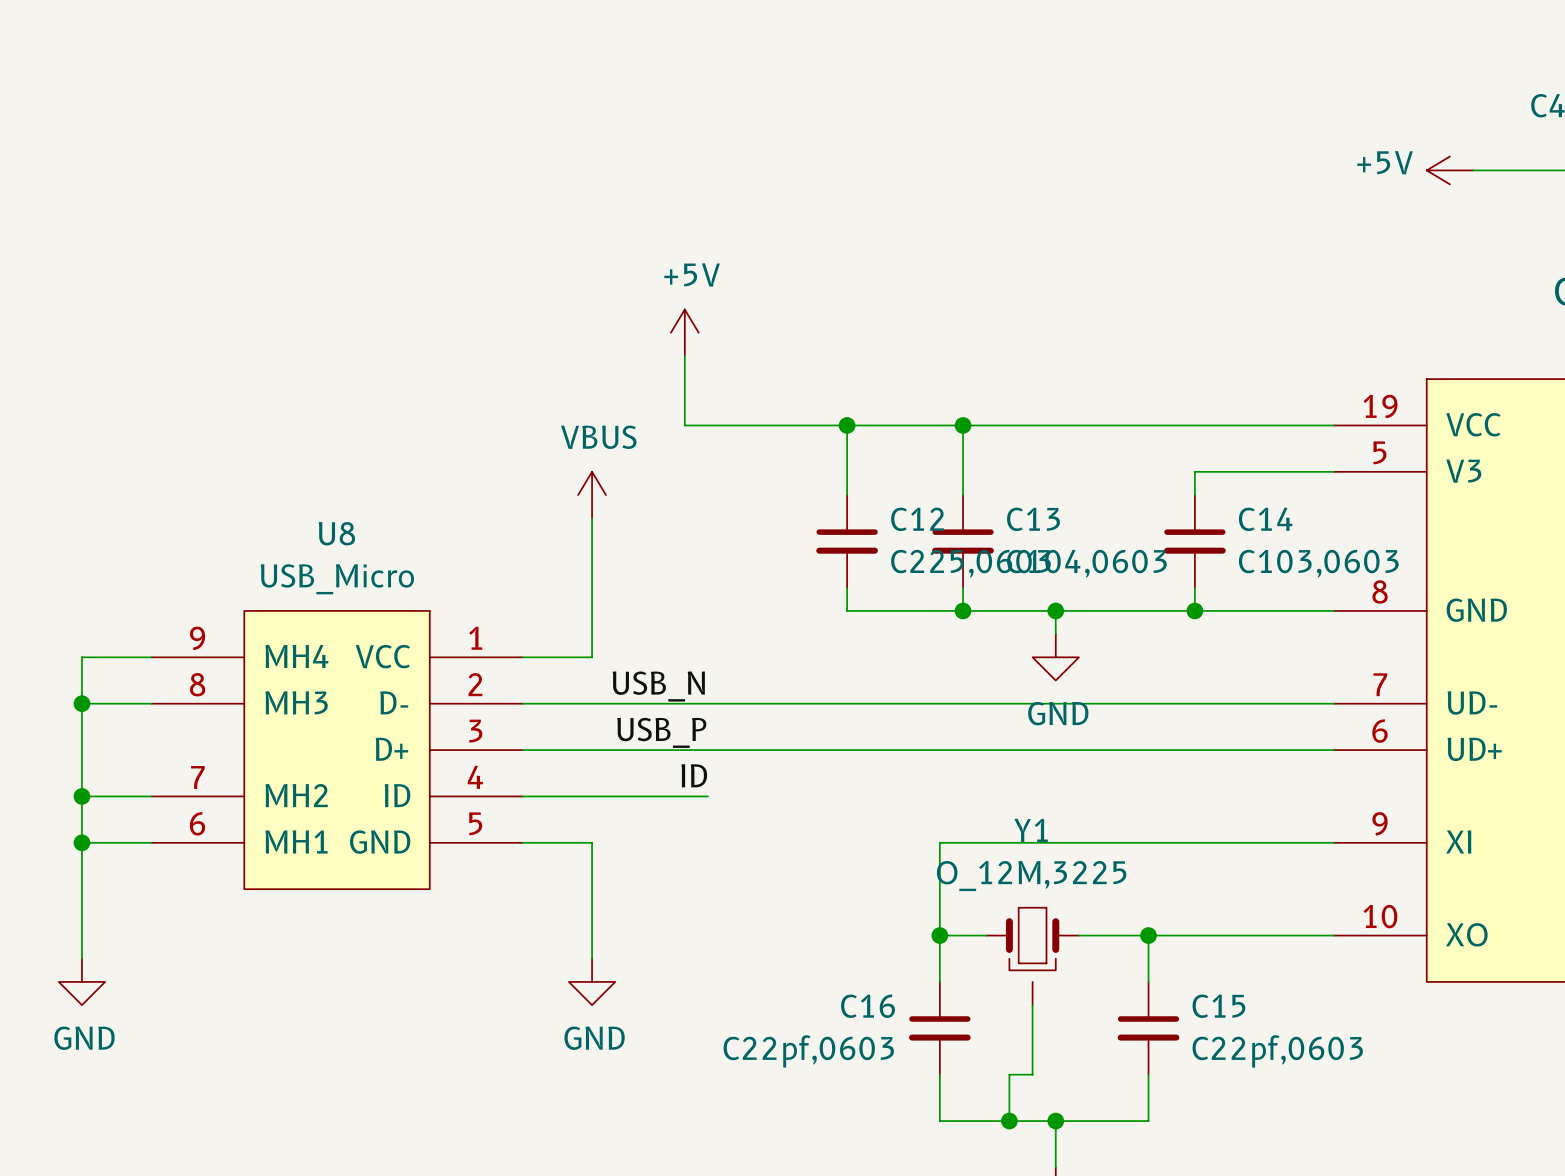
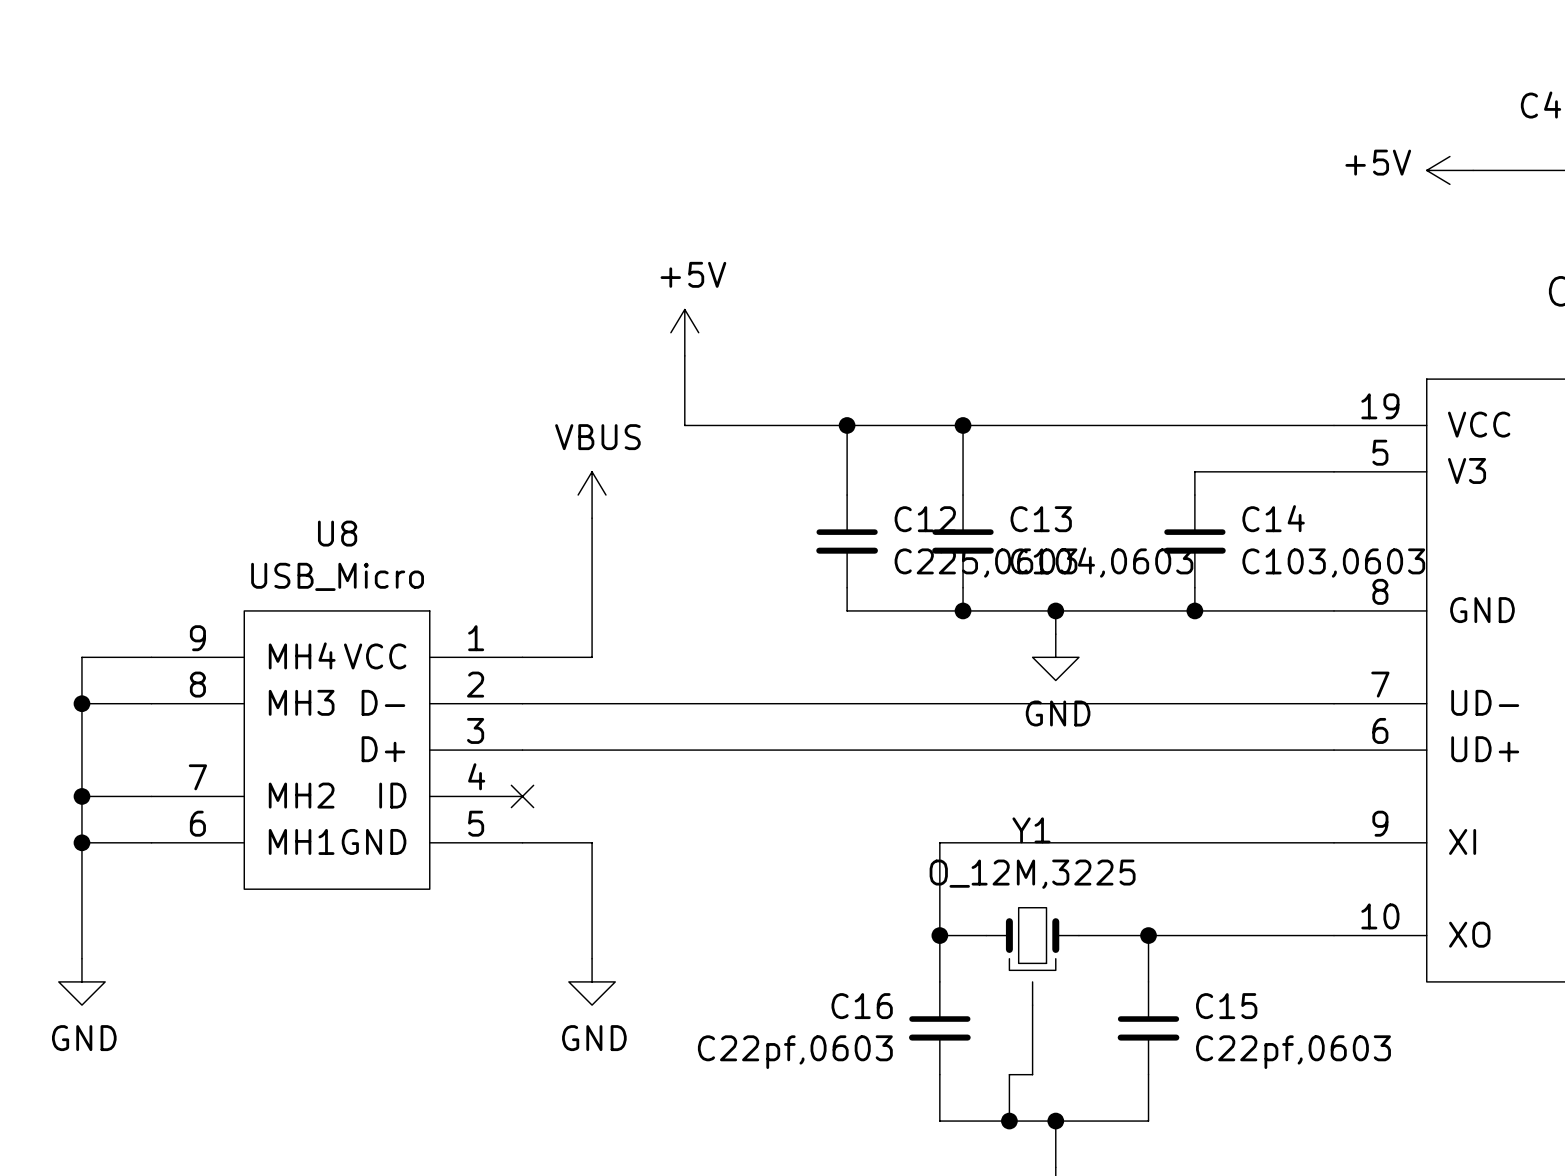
label: USB_N (658, 686) -> none
label: USB_P (661, 732) -> none
label: ID (694, 775) -> none
wire: (522, 796) (707, 796) -> none
no-connect mark: none -> (522, 796)

